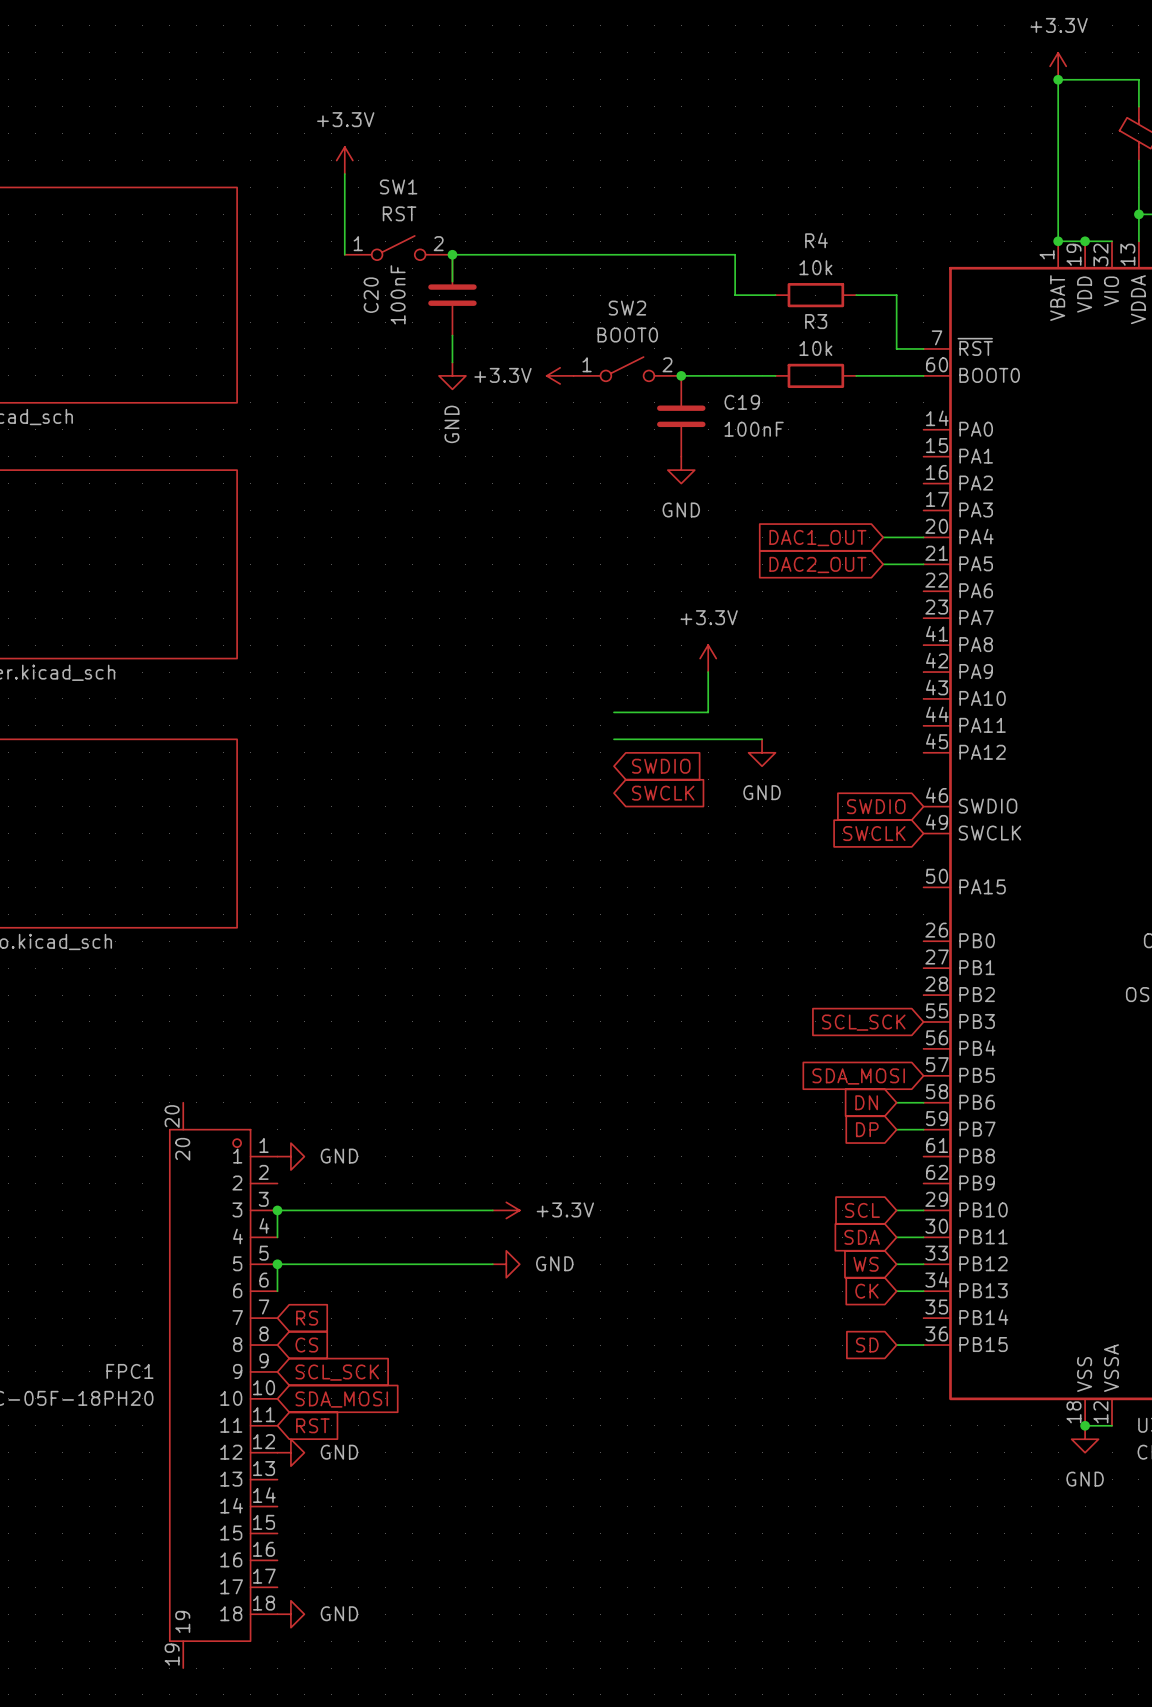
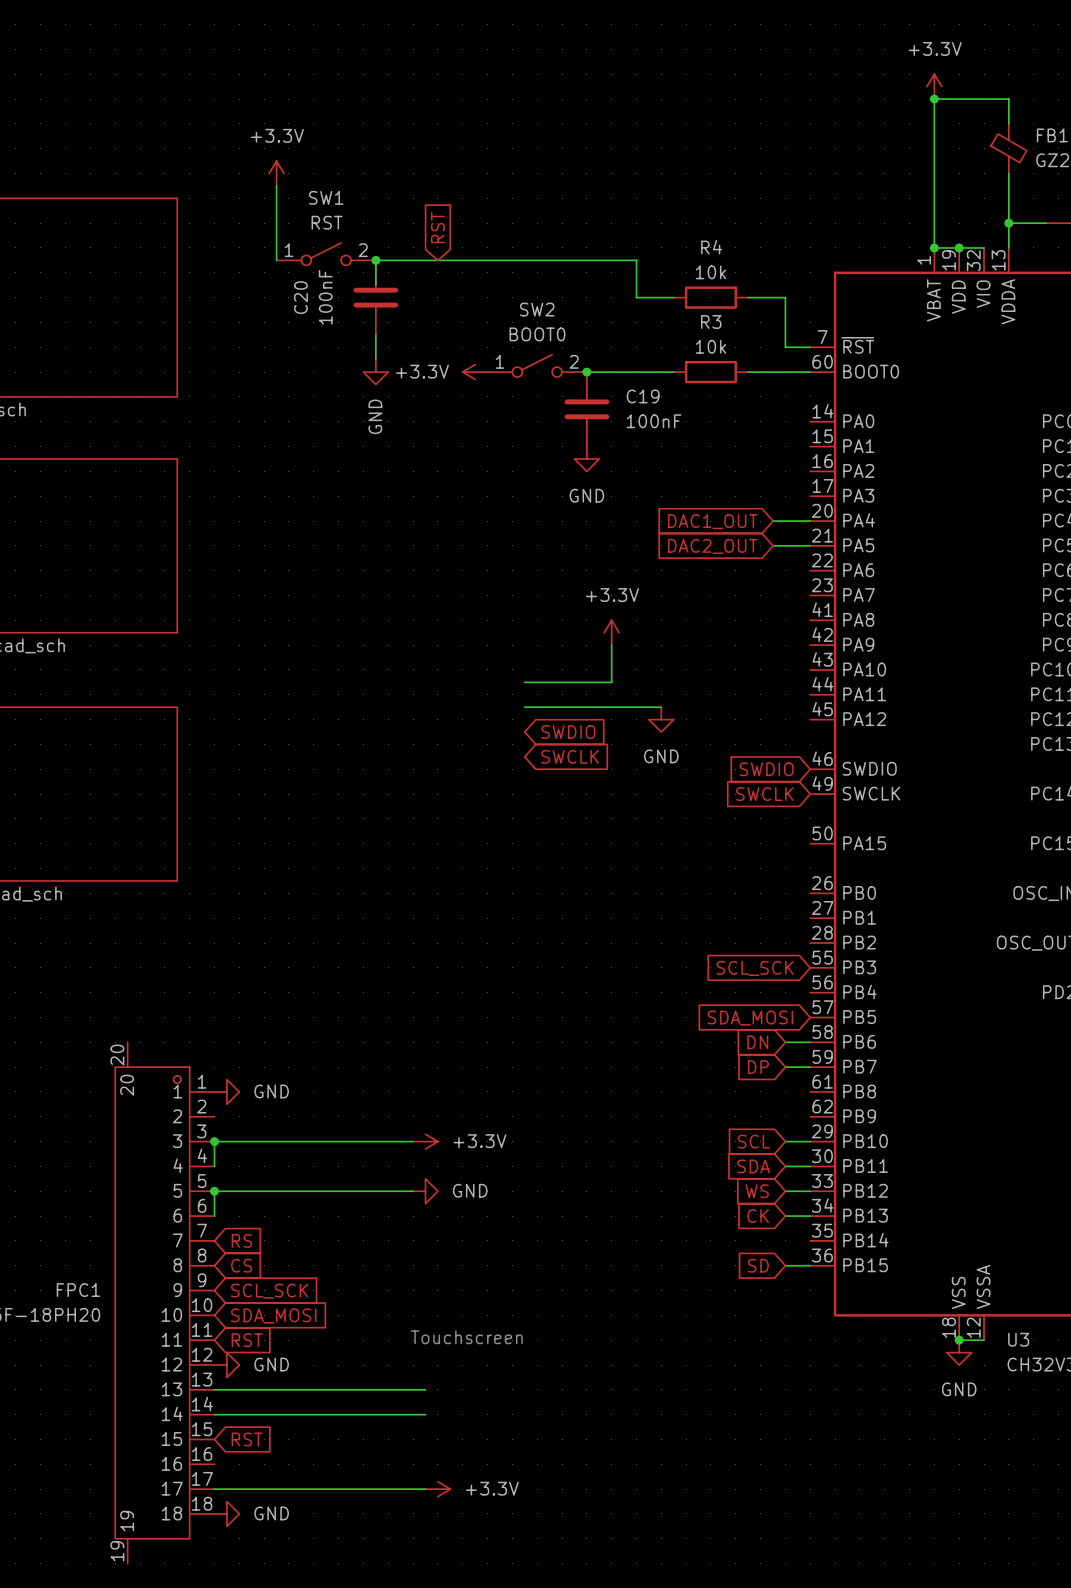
global label: none -> RST (437, 227)
text: none -> Touchscreen (466, 1337)
wire: none -> (214, 1389) (425, 1389)
wire: none -> (214, 1414) (425, 1414)
global label: none -> RST (247, 1439)
wire: none -> (214, 1489) (425, 1489)
power symbol: none -> +3.3V (437, 1489)

